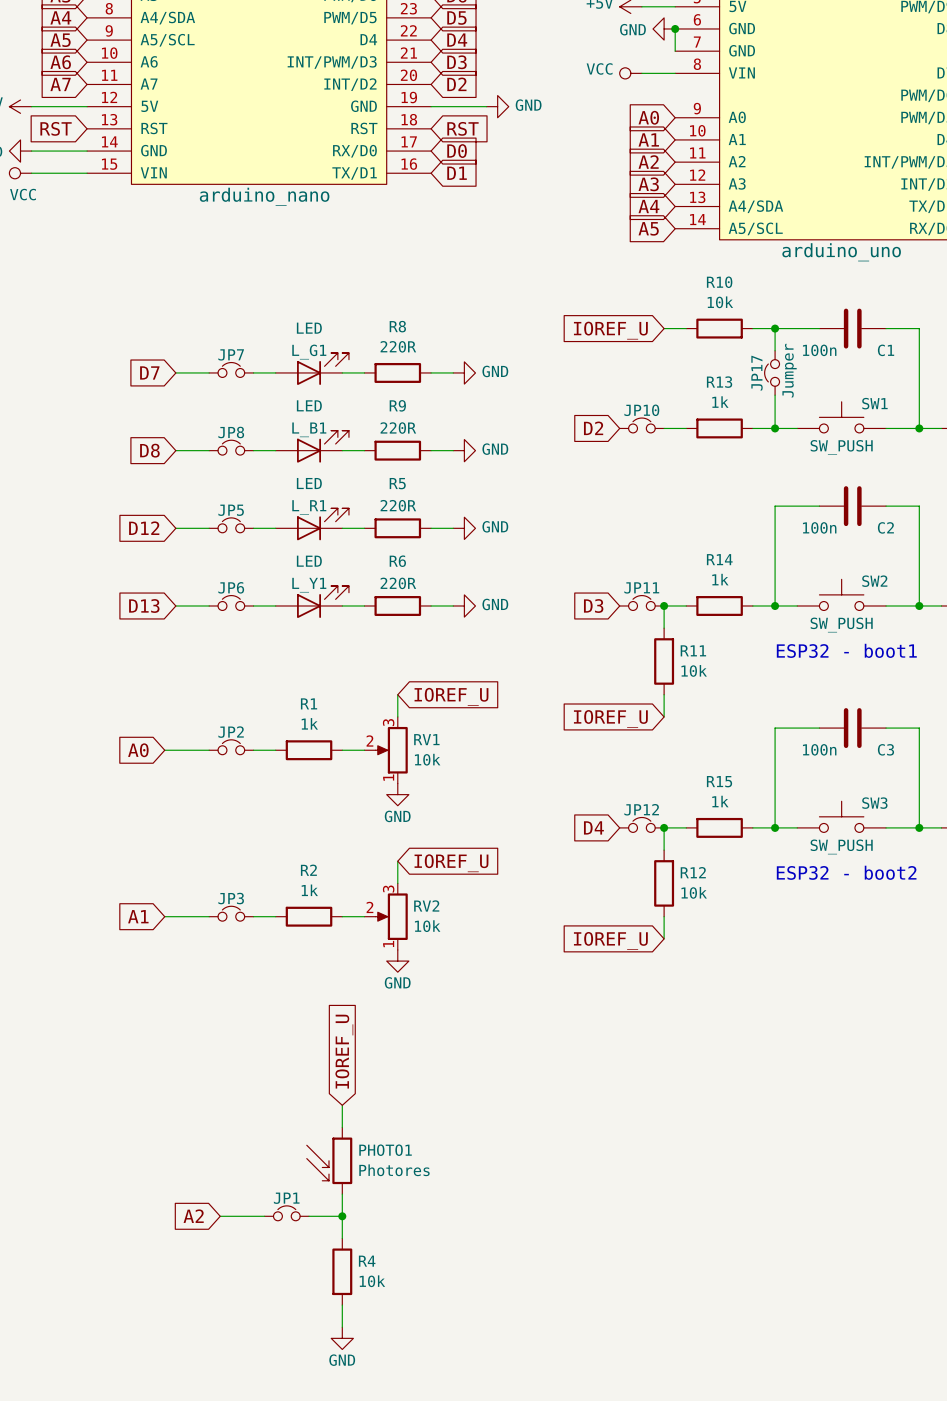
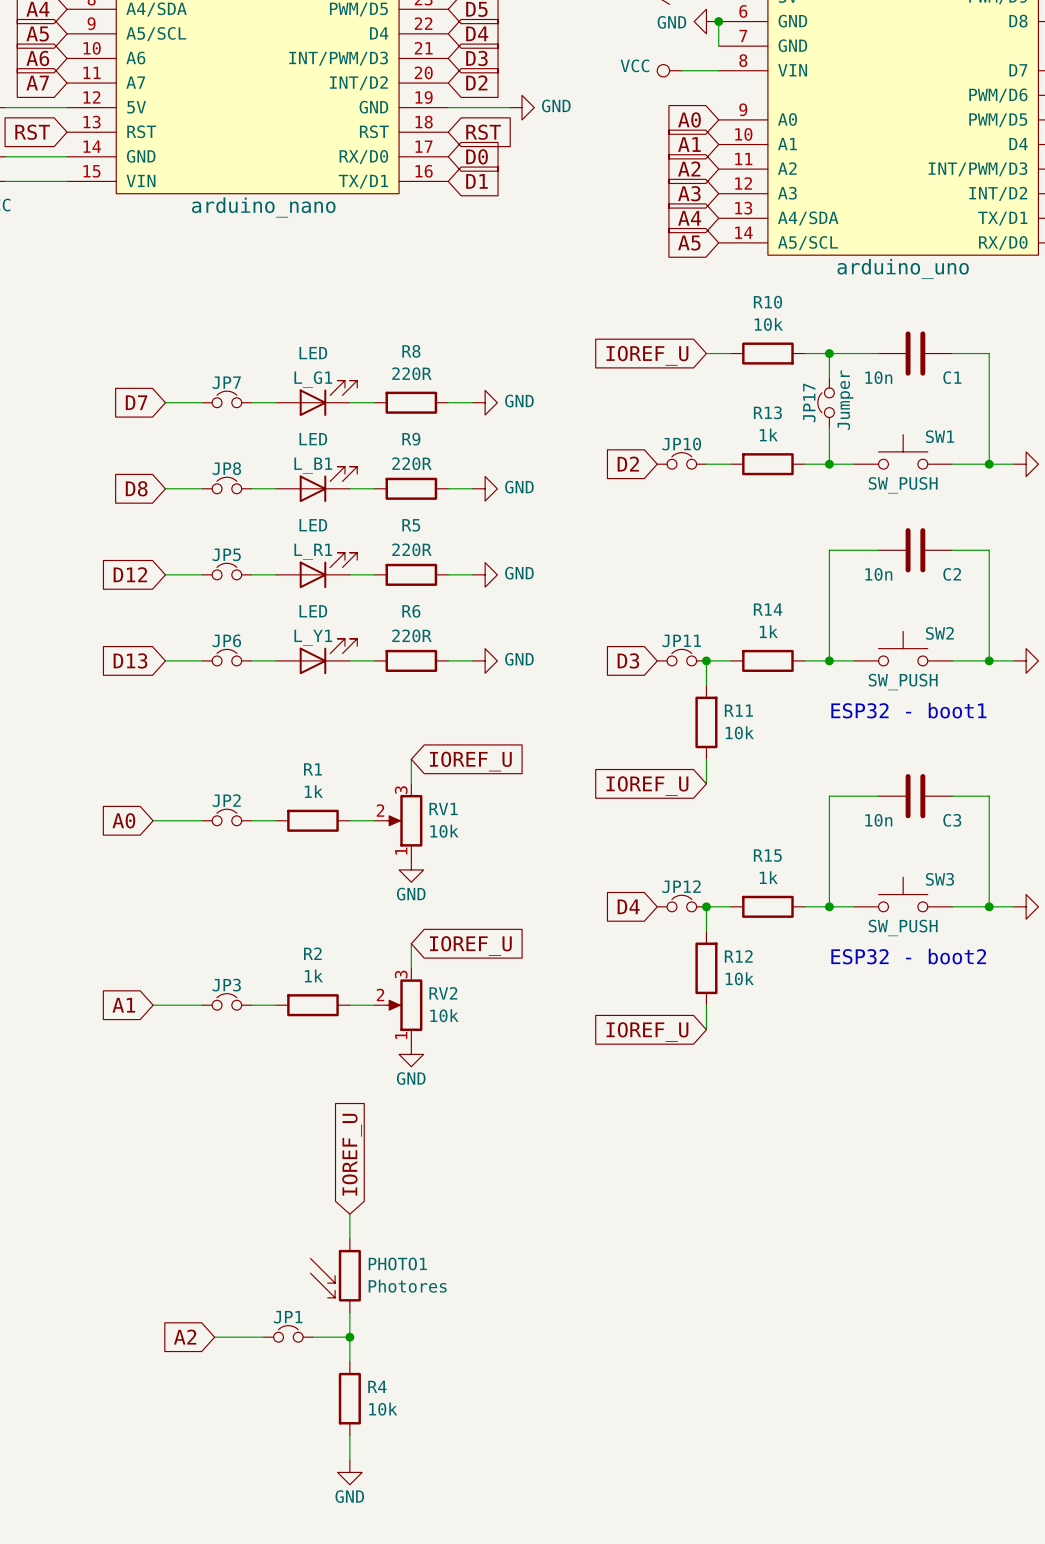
C1 value: 100n (819, 350) -> 10n (878, 377)
C2 value: 100n (819, 527) -> 10n (878, 574)
C3 value: 100n (819, 749) -> 10n (878, 820)

